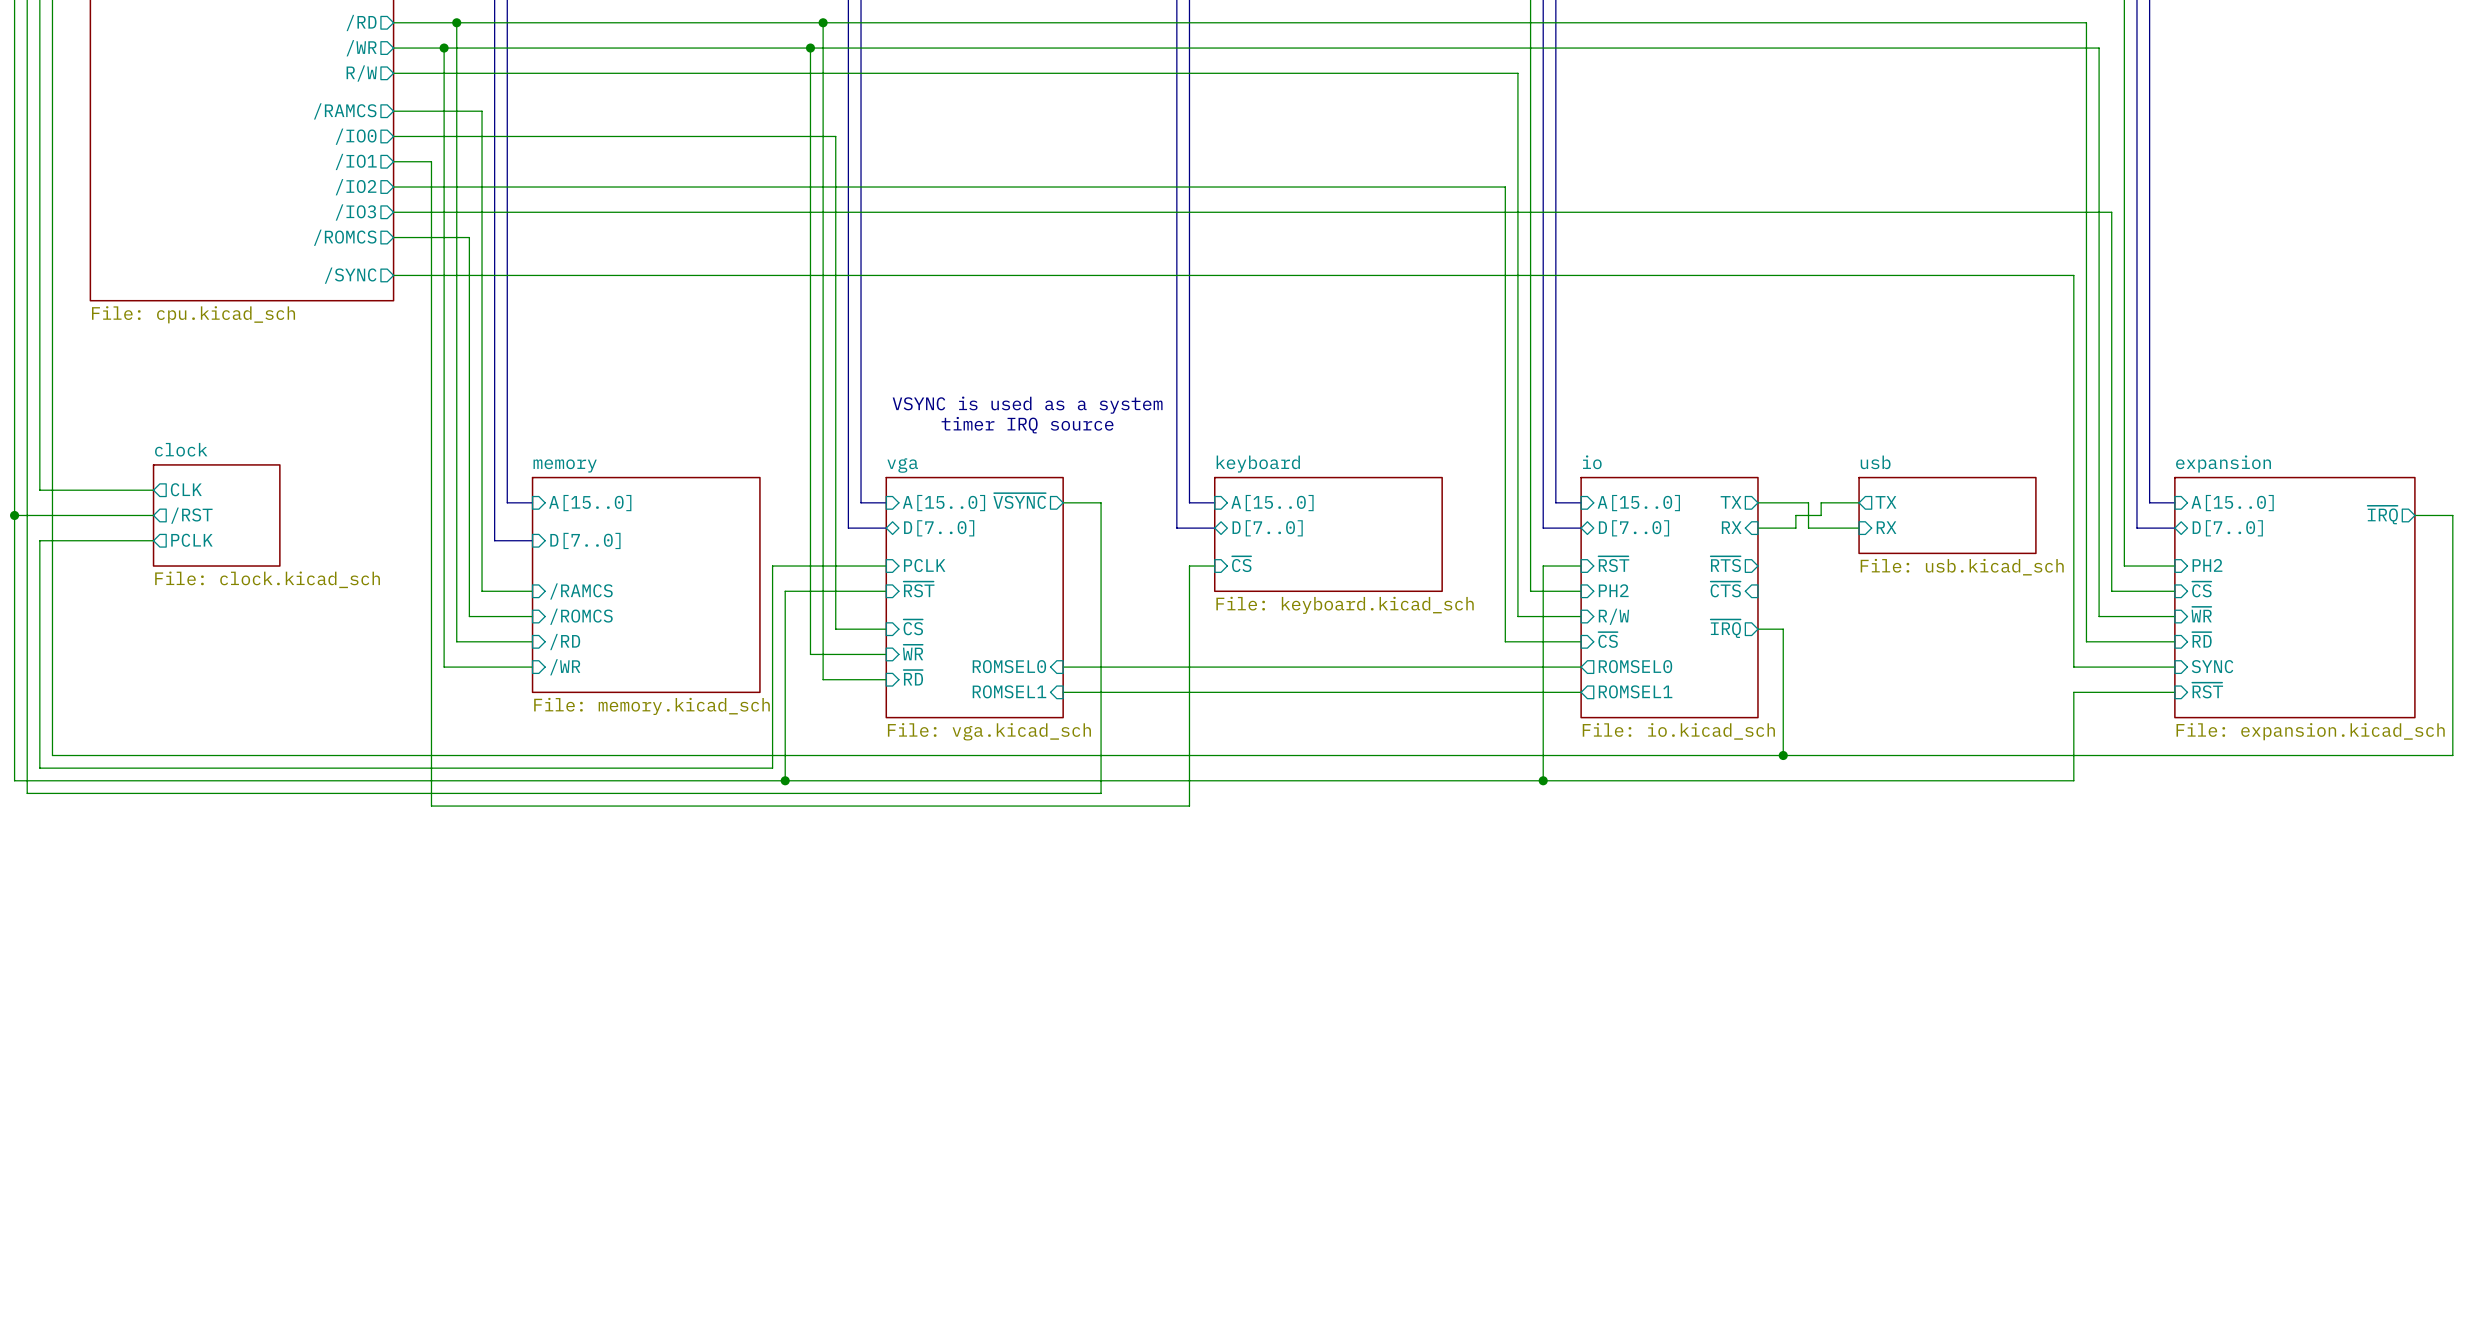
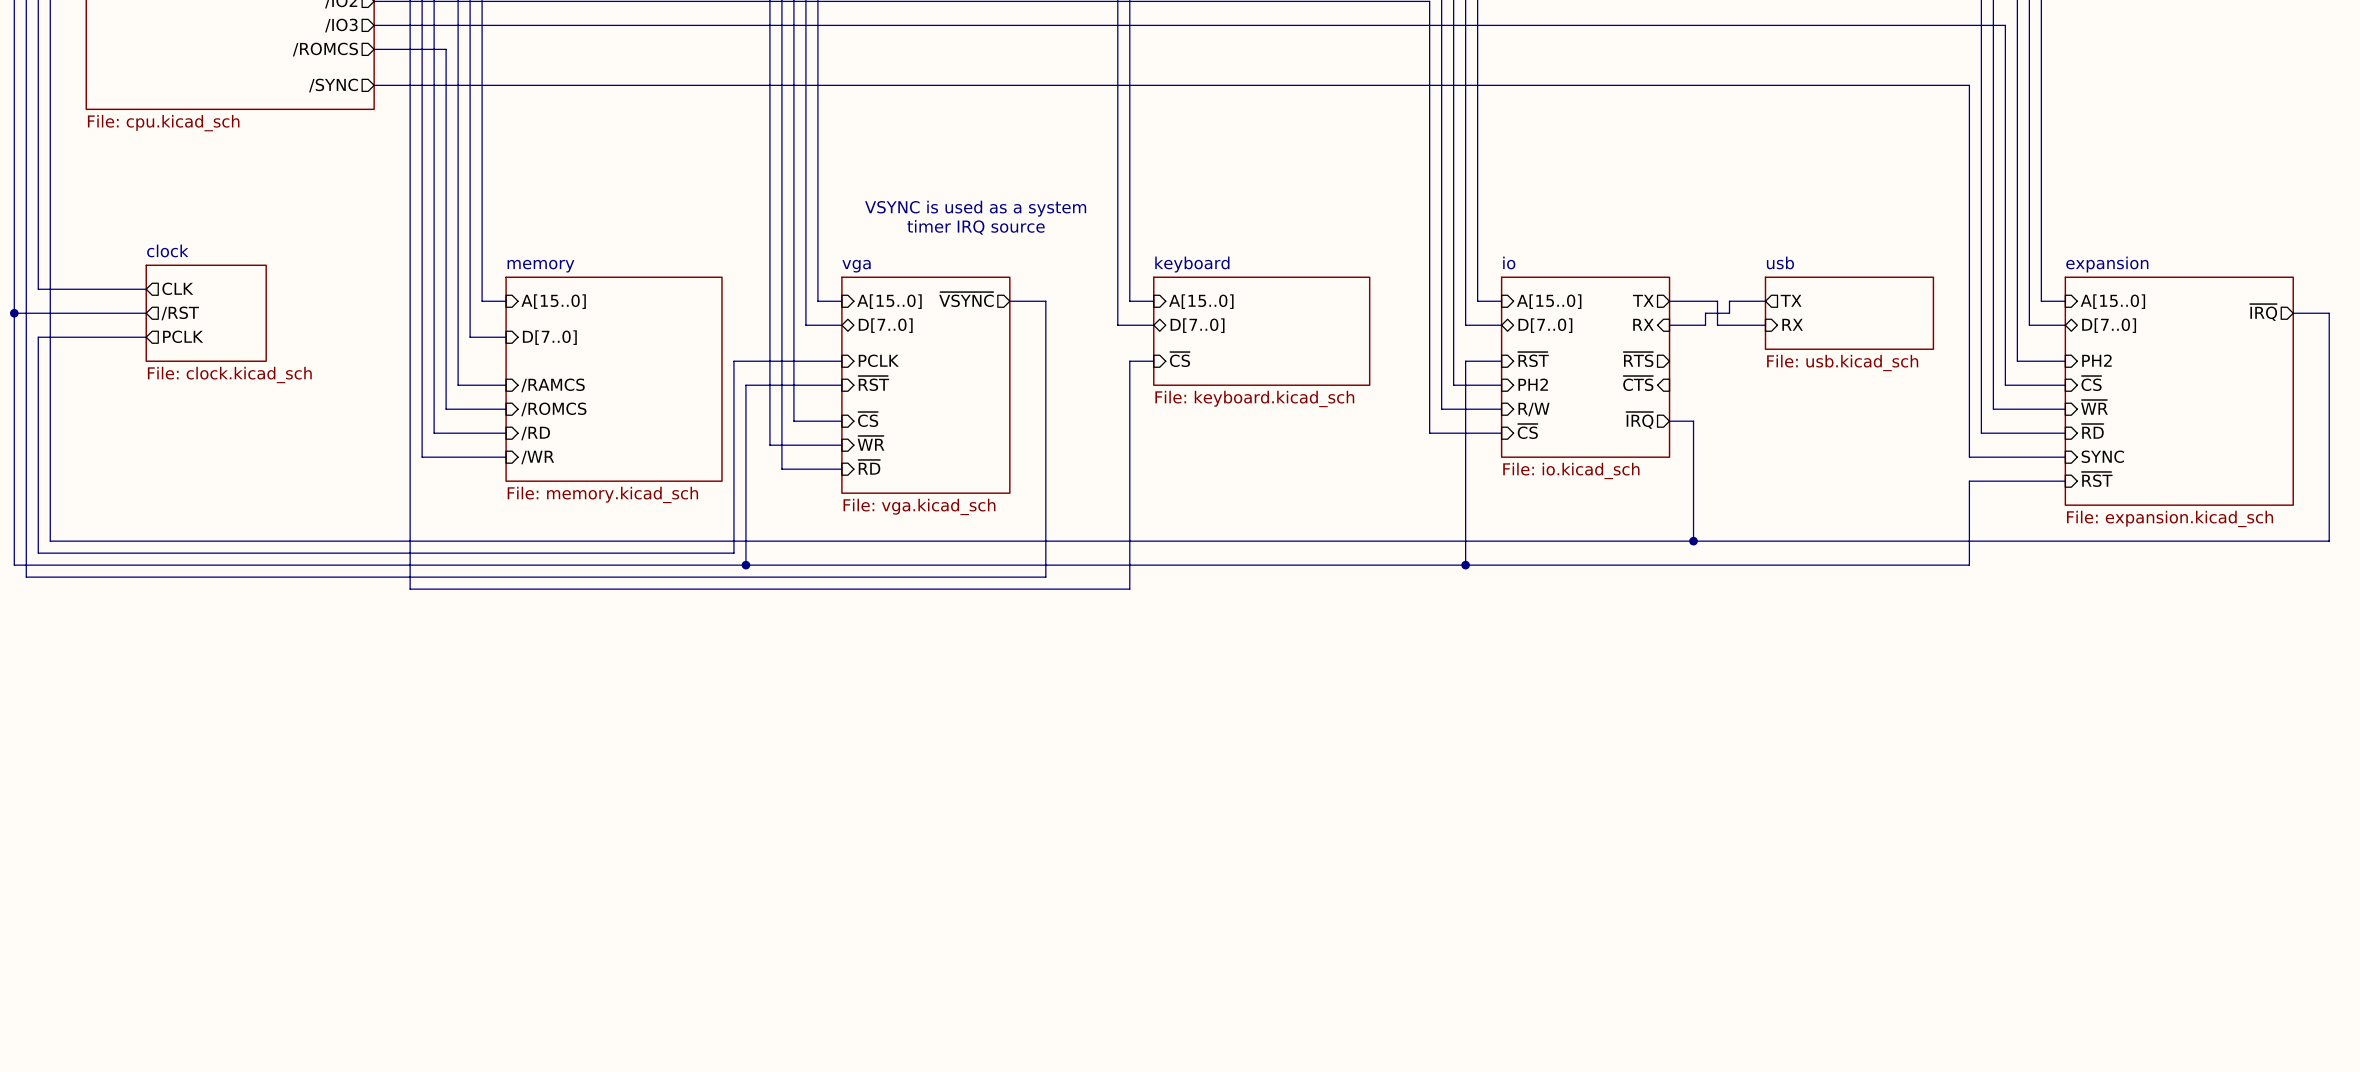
sheet vga shape: [885, 476, 1064, 719] -> [841, 276, 1011, 494]
sheet io: none -> File: io.kicad_sch (1585, 367)
sheet io: File: io.kicad_sch (1669, 597) -> none
sheet pin: ROMSEL0 (1009, 666) -> none
sheet pin: ROMSEL0 (1635, 666) -> none
wire: (1063, 667) (1581, 667) -> none
sheet pin: ROMSEL1 (1009, 691) -> none
sheet pin: ROMSEL1 (1635, 691) -> none
wire: (1063, 692) (1581, 692) -> none

